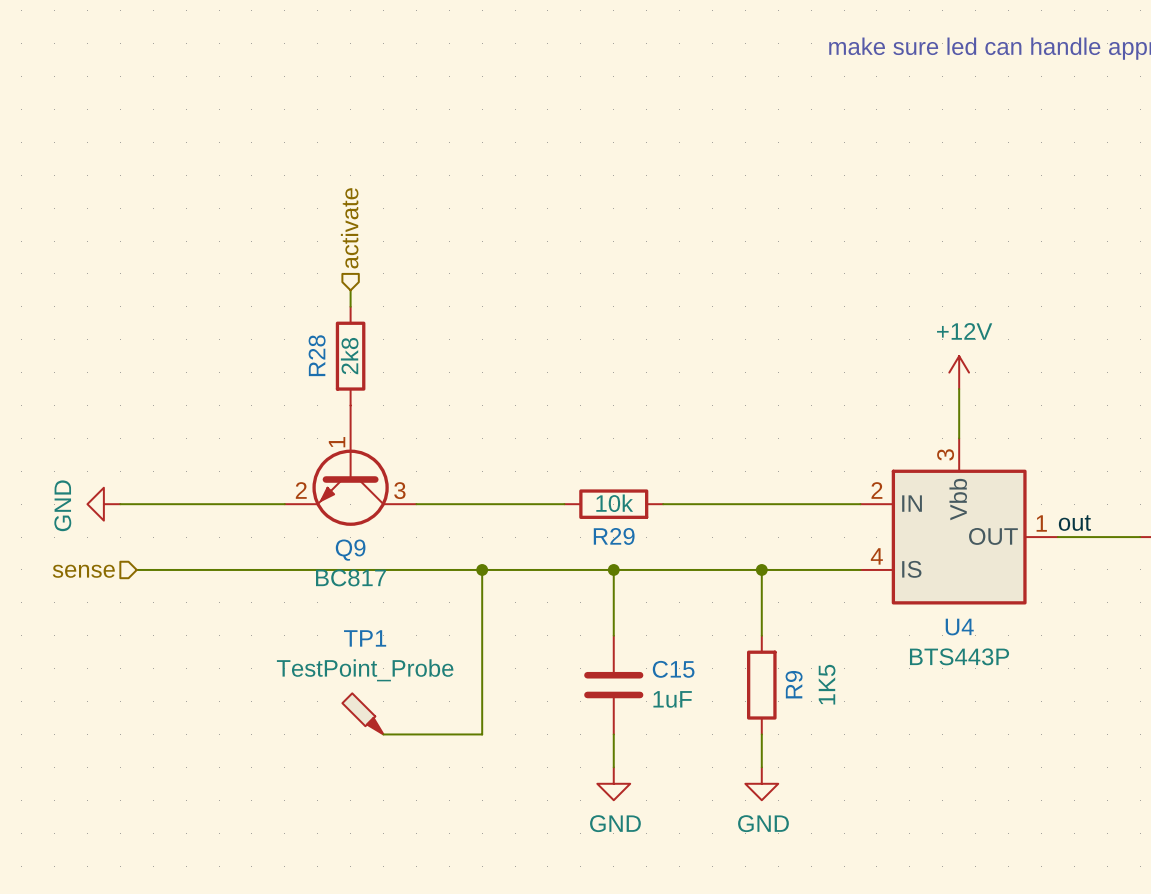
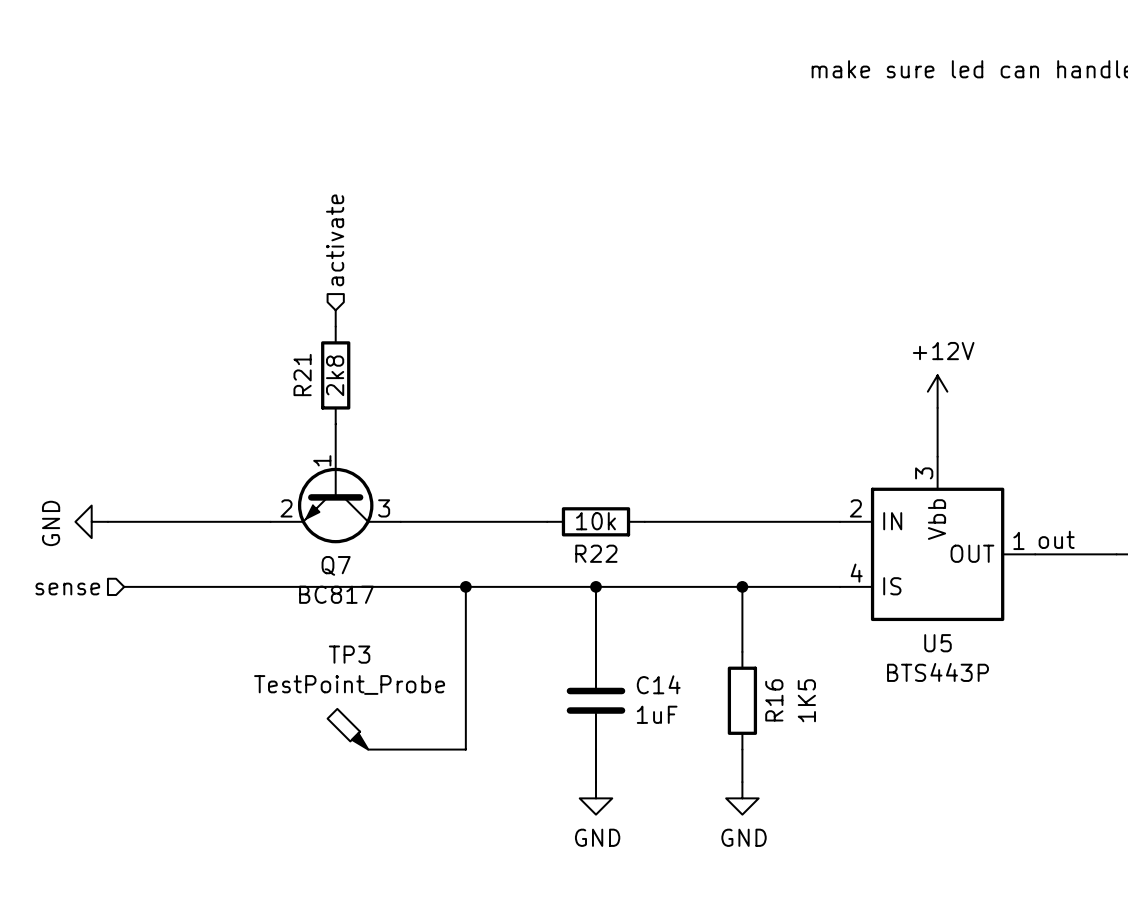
R28 name: R28 (317, 355) -> R21 (302, 375)
R29 name: R29 (614, 536) -> R22 (596, 553)
Q9 name: Q9 (350, 550) -> Q7 (336, 565)
U4 name: U4 (959, 627) -> U5 (938, 643)
TP1 name: TP1 (365, 638) -> TP3 (349, 654)
C15 name: C15 (673, 669) -> C14 (658, 684)
R9 name: R9 (794, 684) -> R16 (774, 700)

